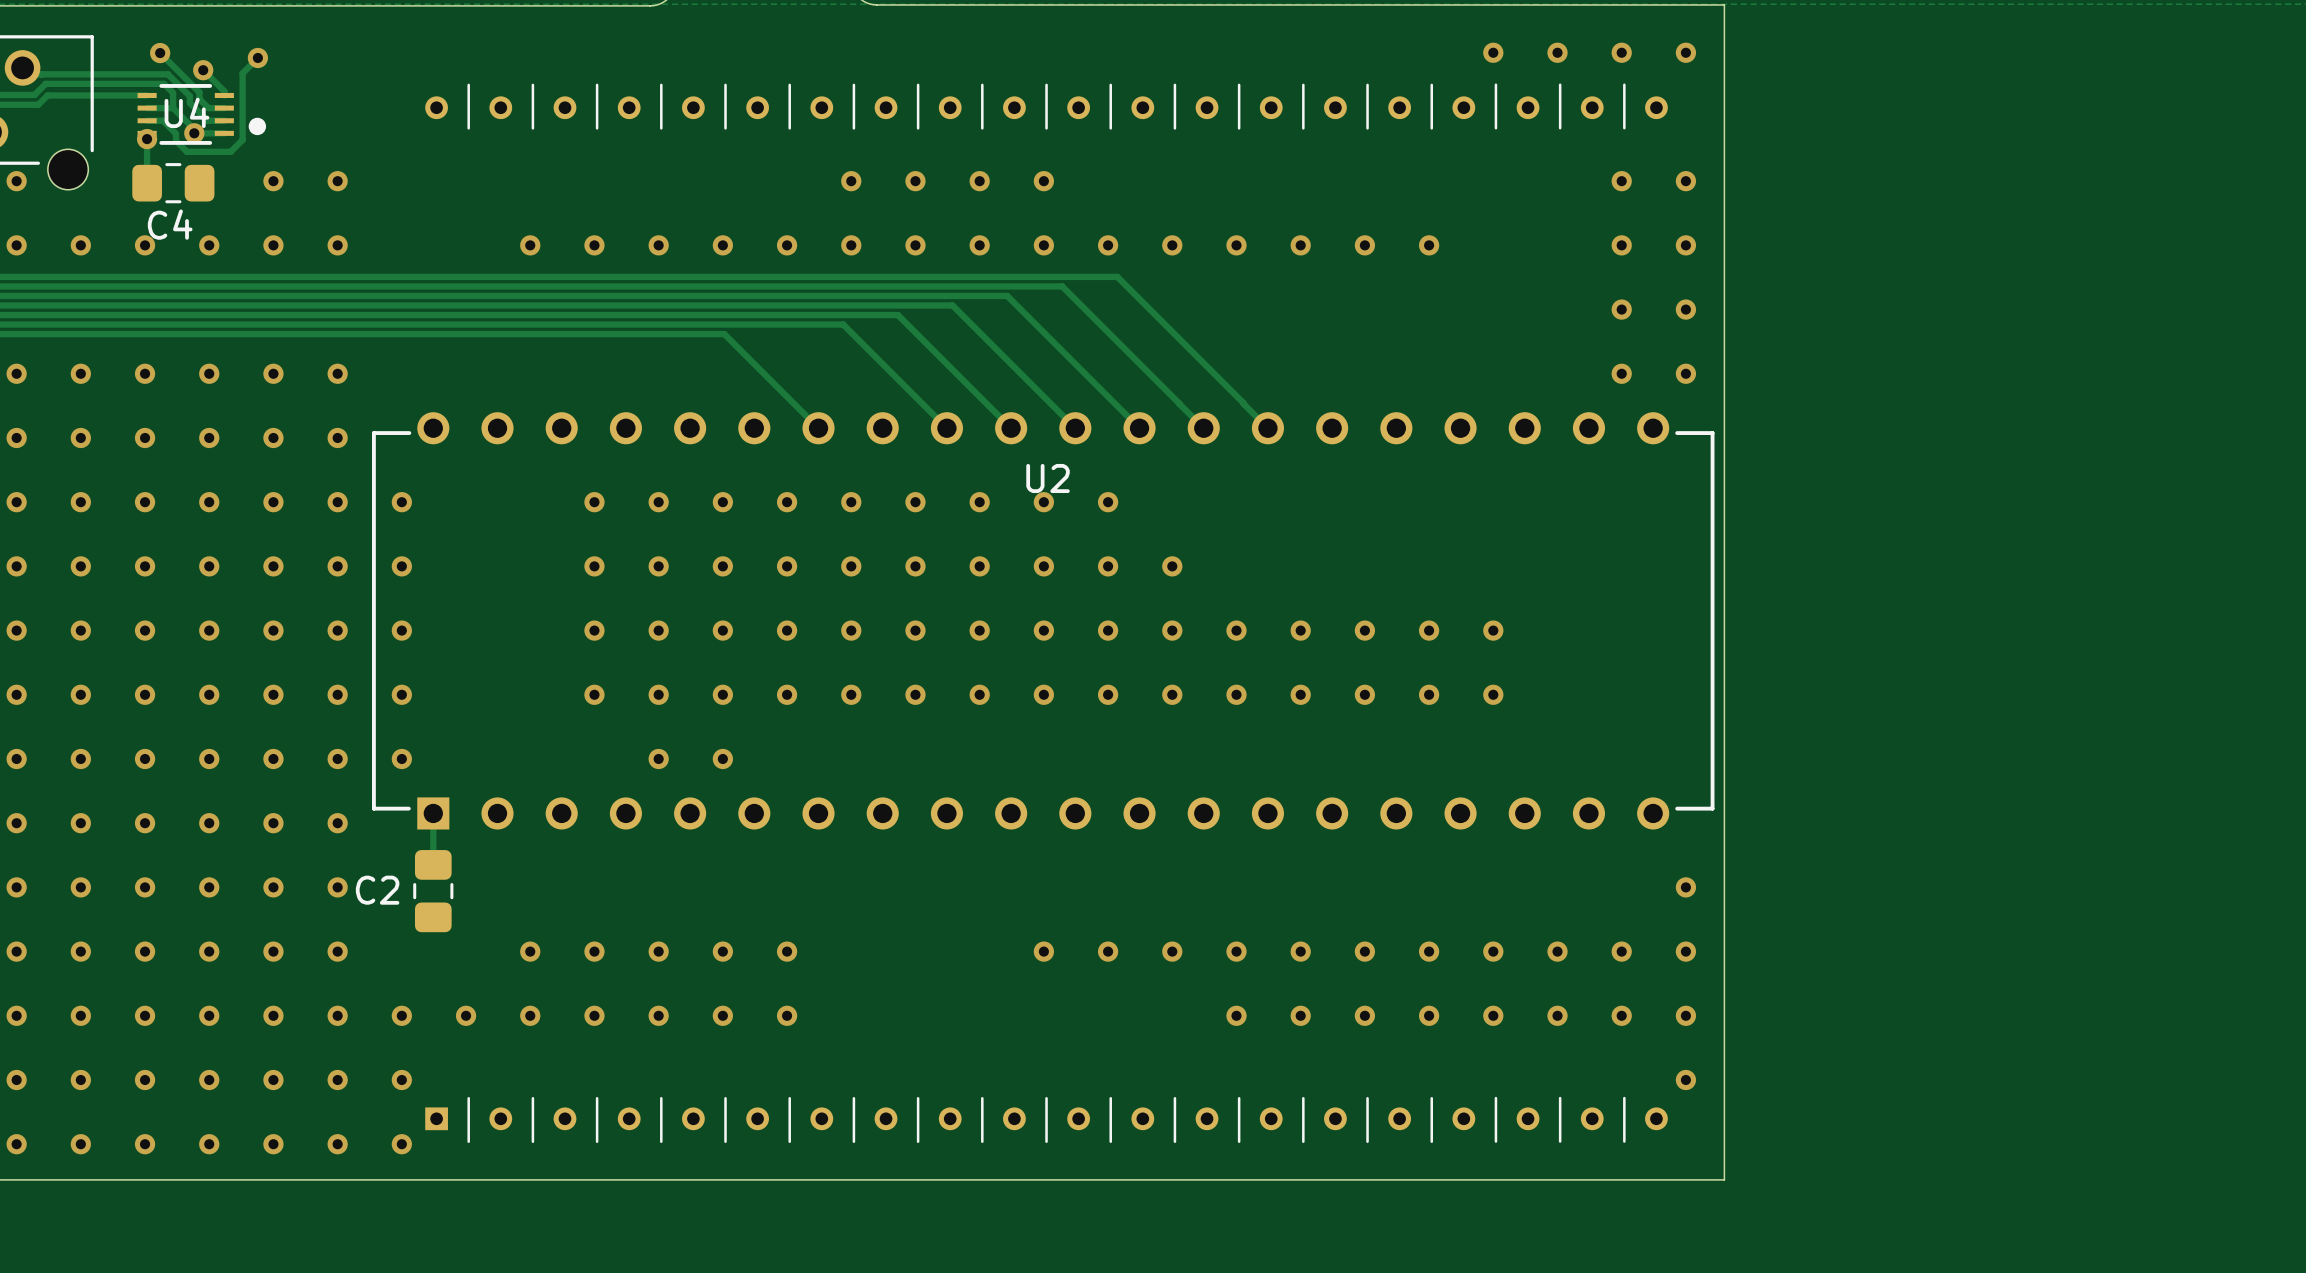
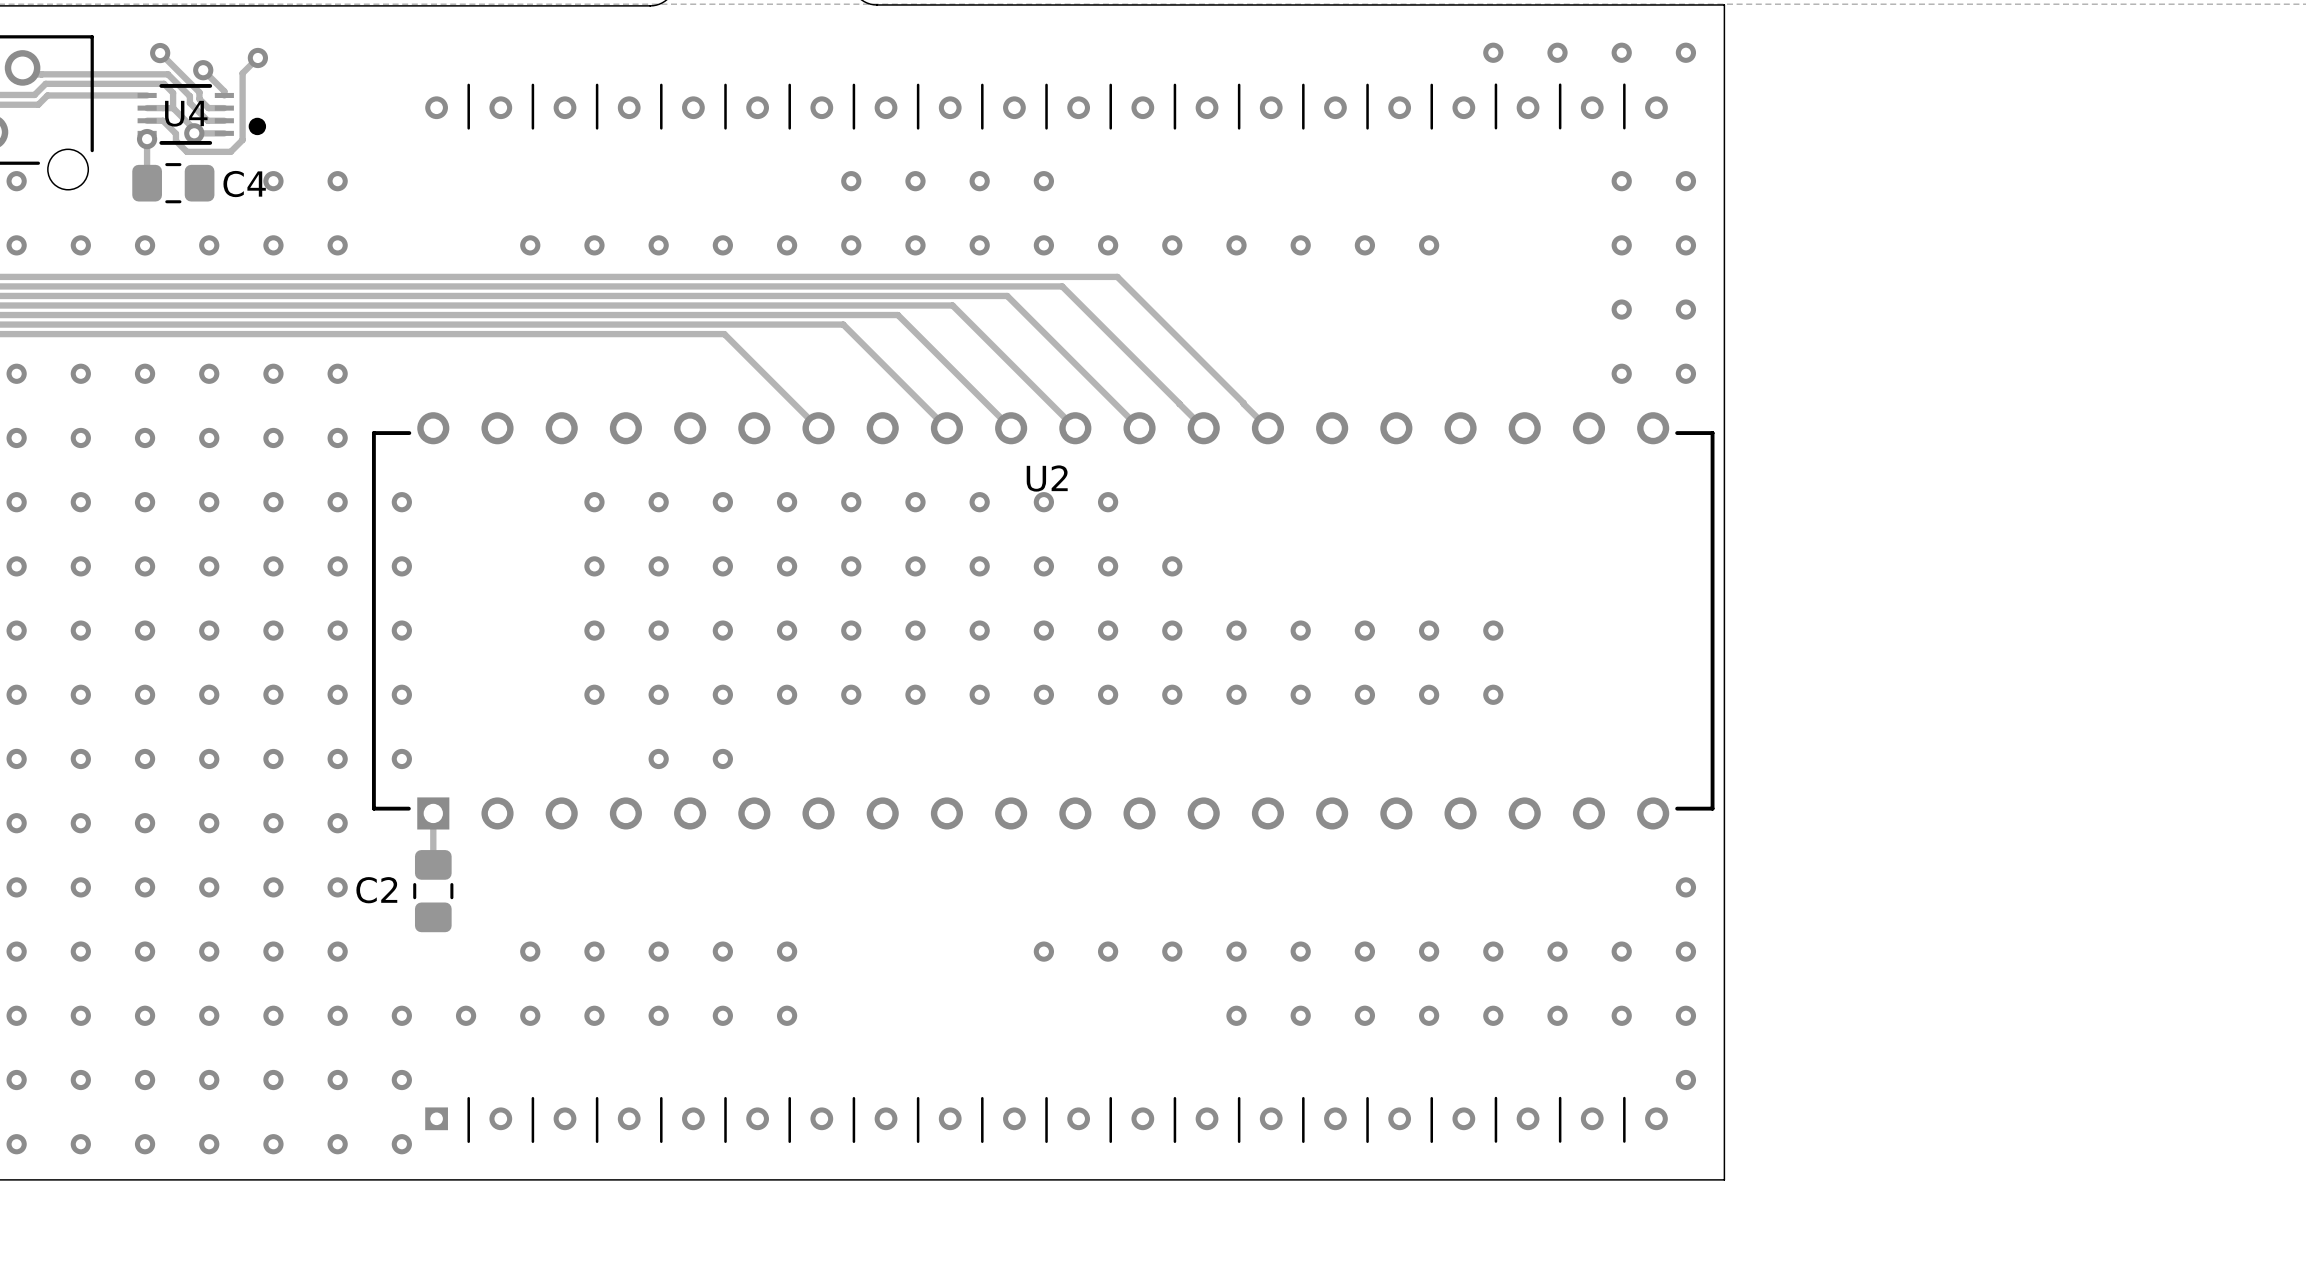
C4 name position: C4 (170, 224) -> C4 (244, 184)

